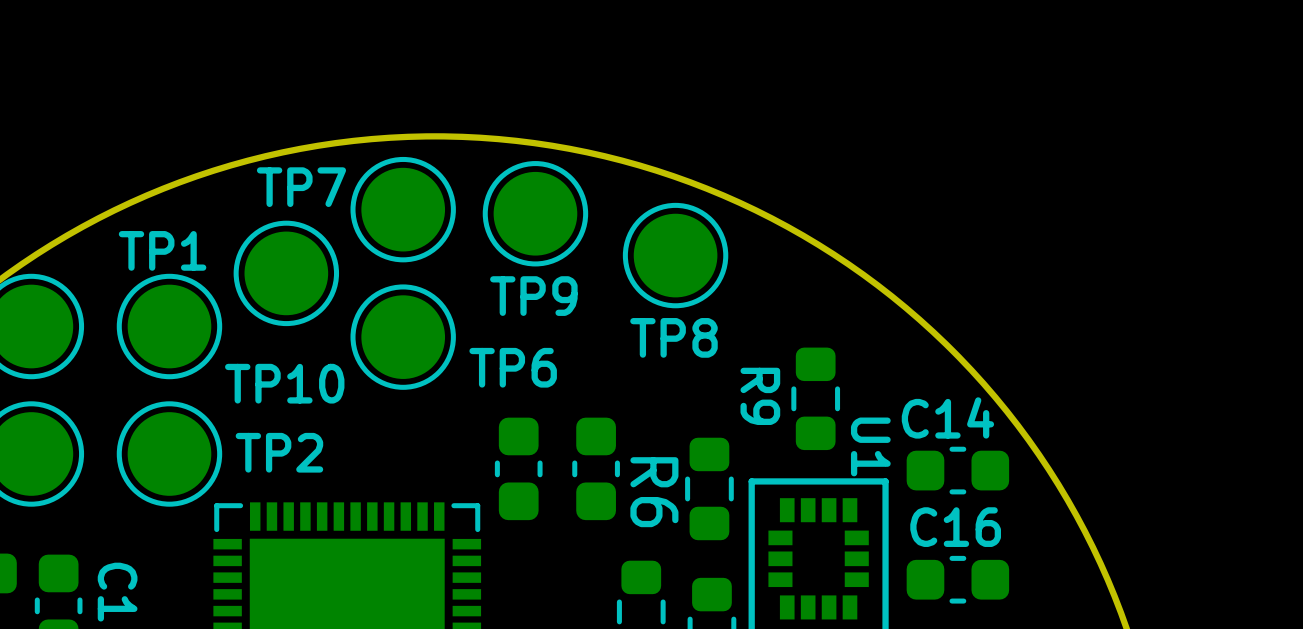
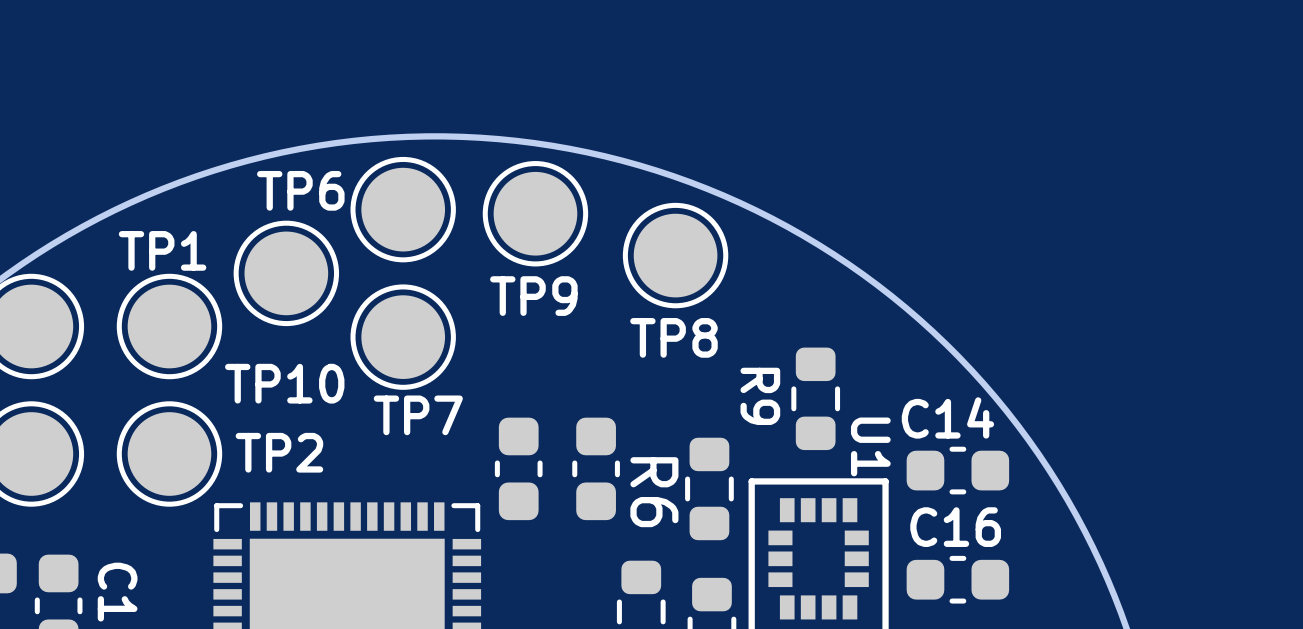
TP7 name: TP7 (301, 187) -> TP6 (300, 190)
TP6 name: TP6 (513, 367) -> TP7 (418, 415)

